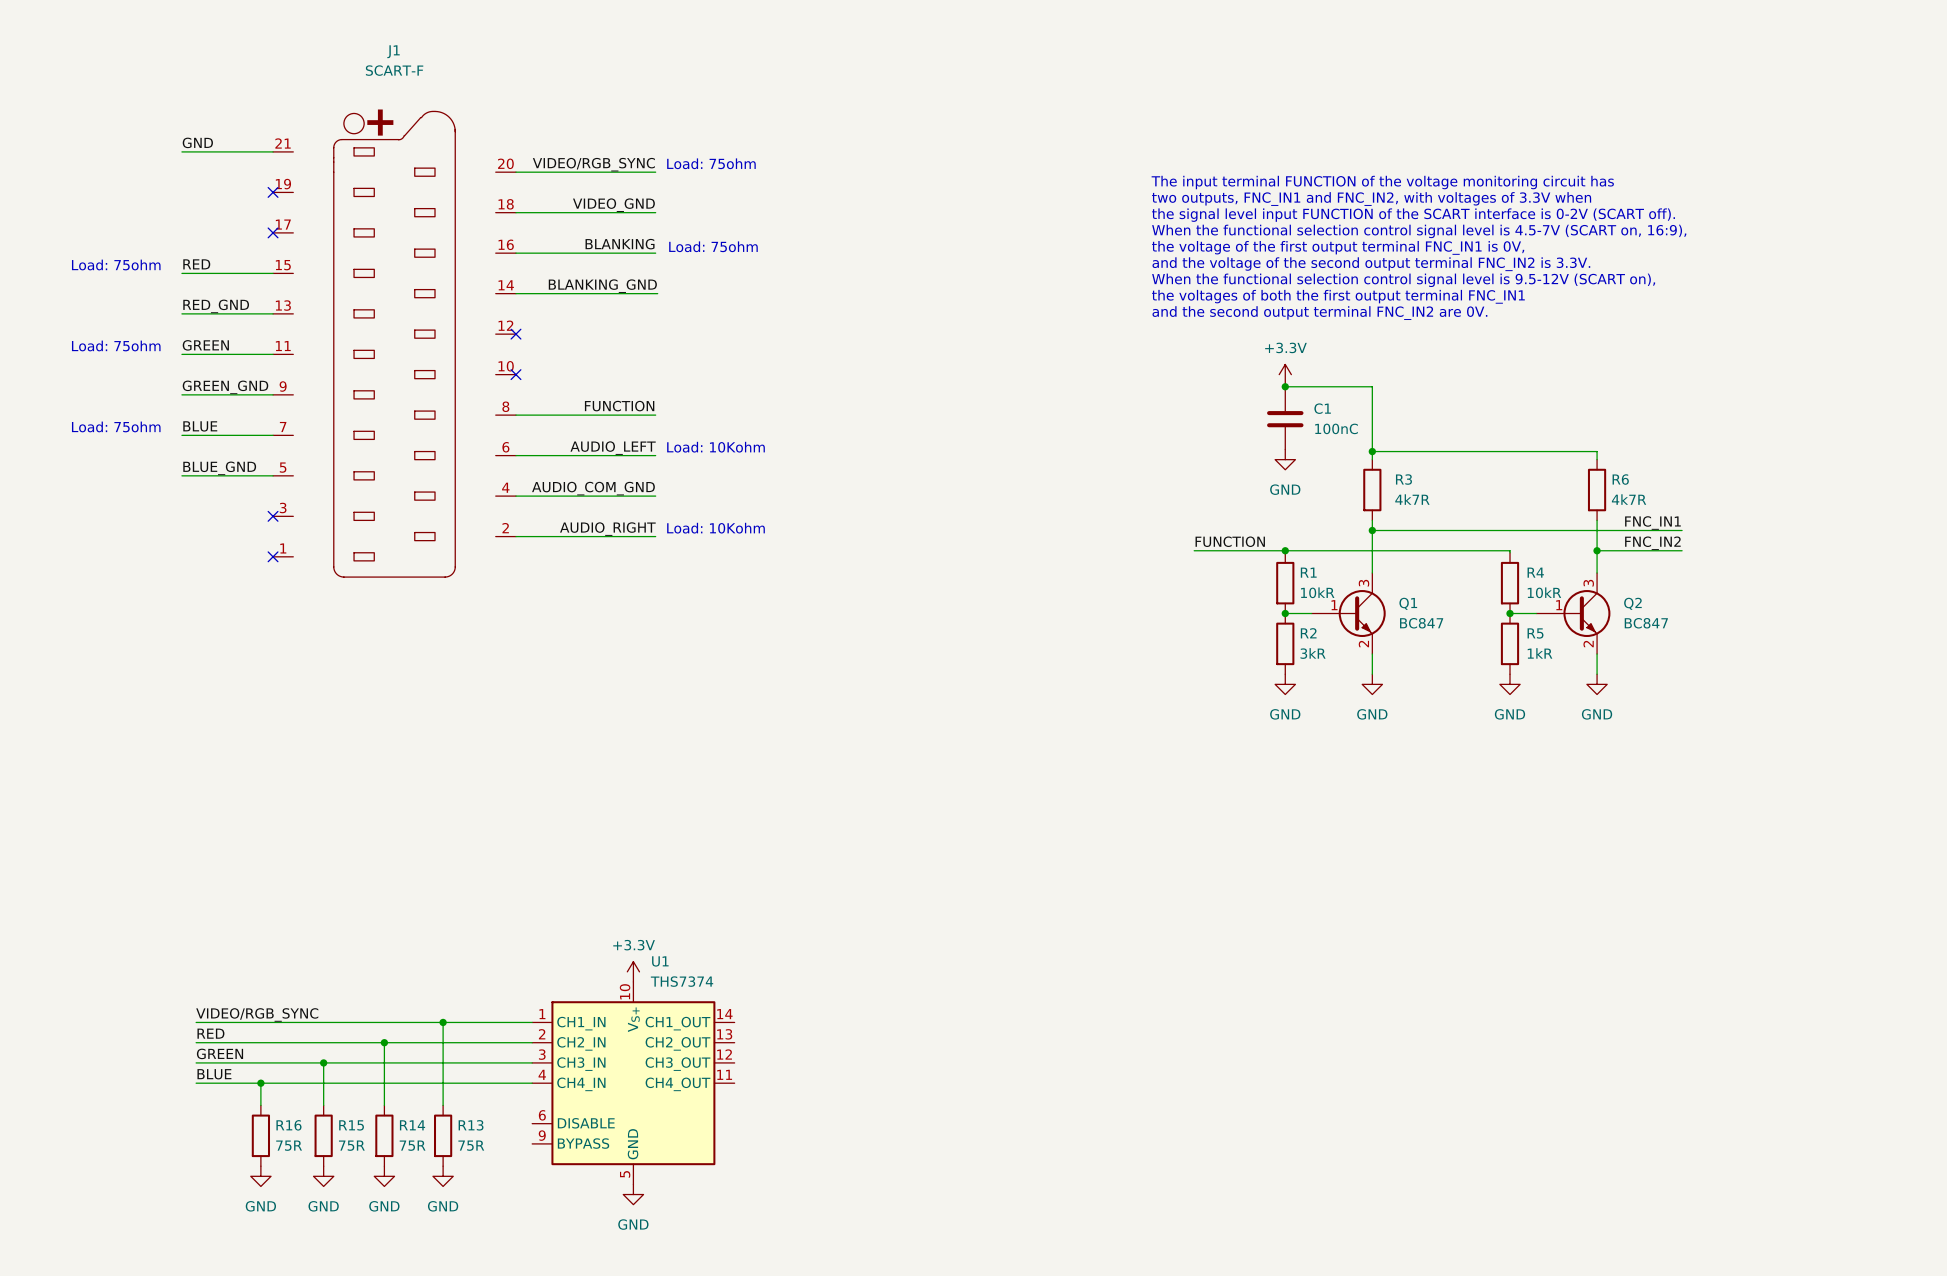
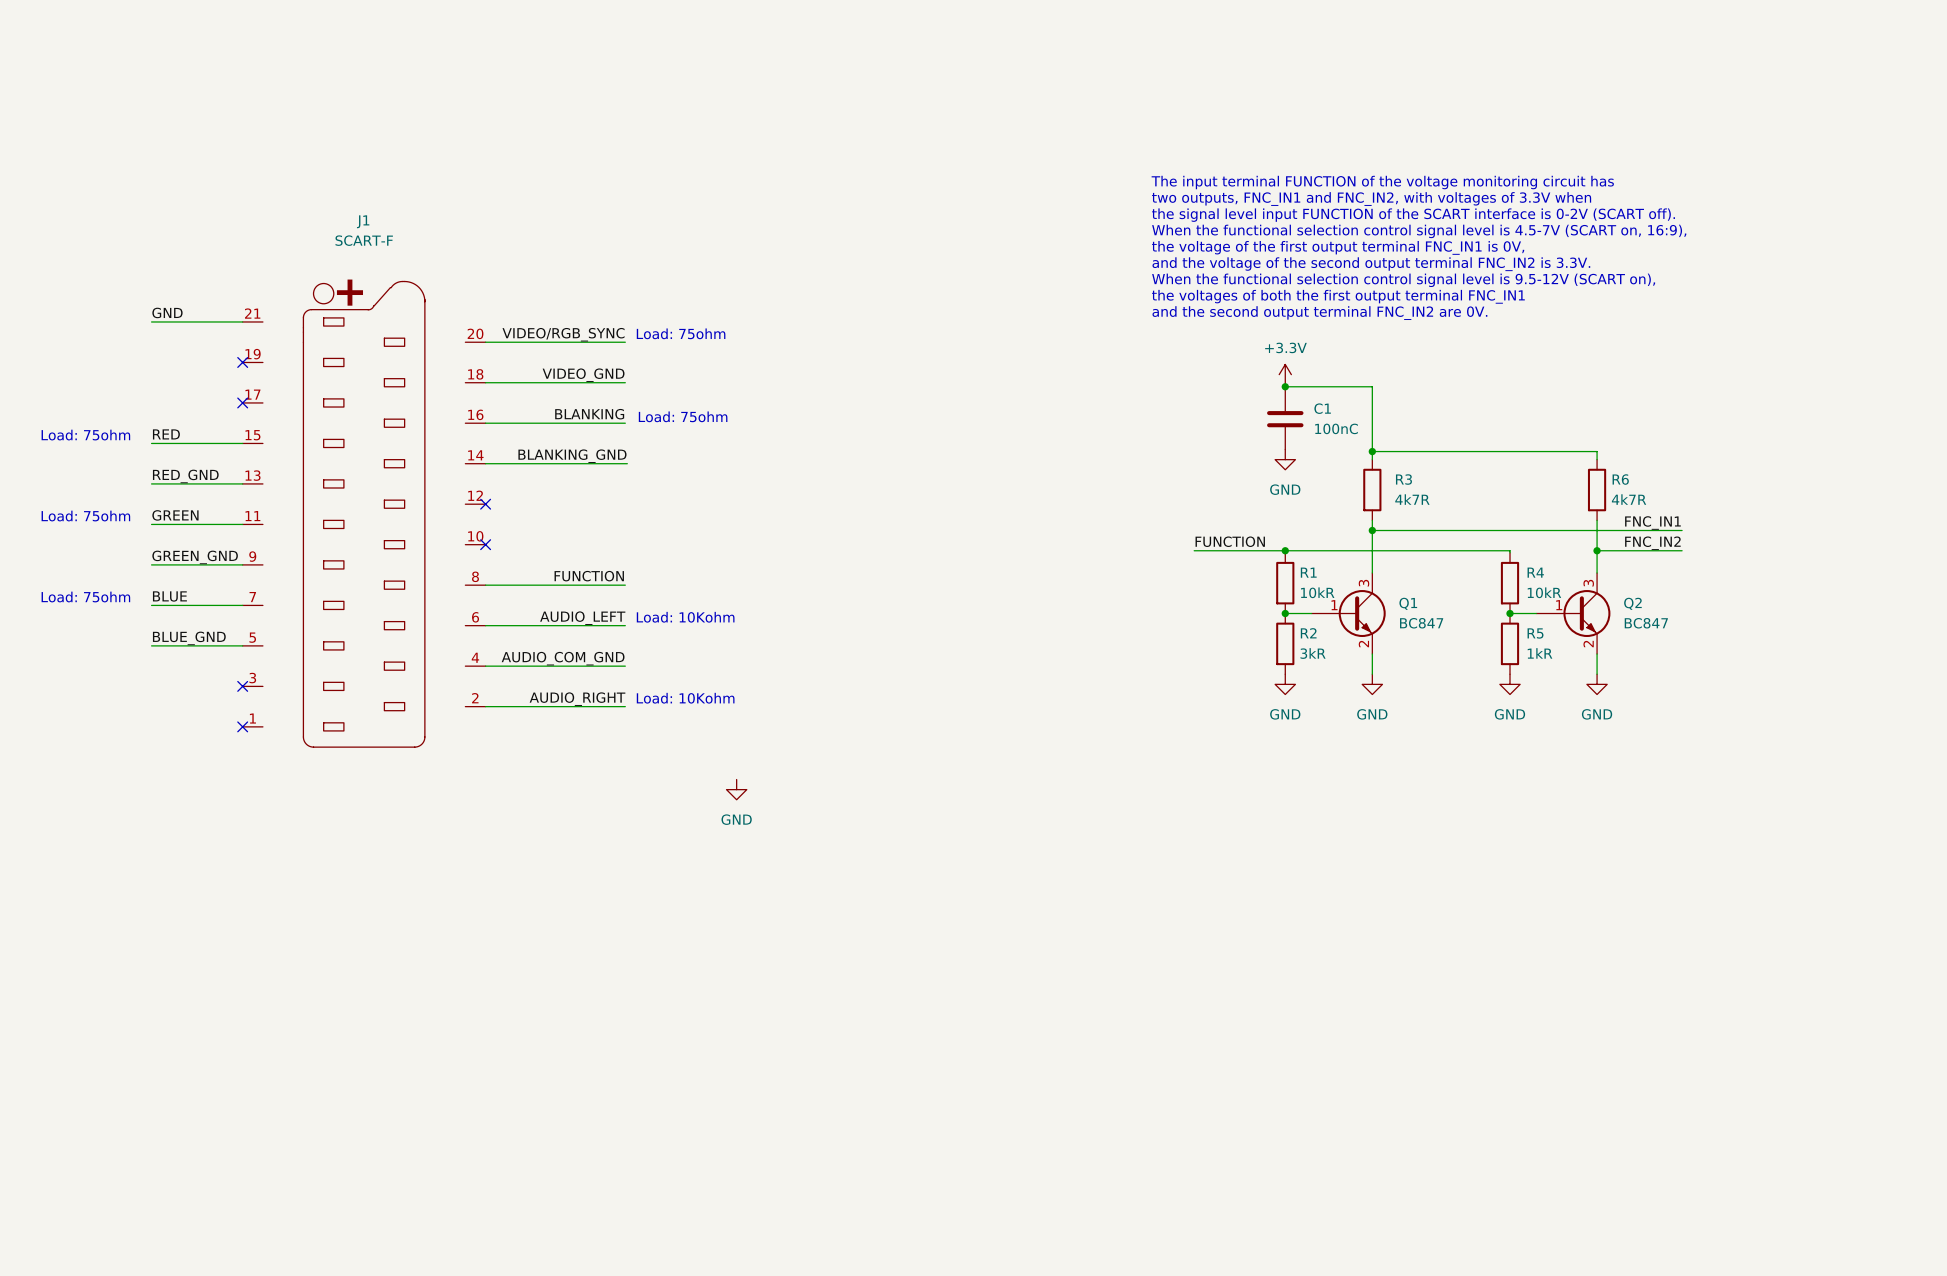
label position: GND (197, 142) -> GND (167, 312)
wire: (181, 151) (273, 151) -> (151, 321) (242, 321)
text: Load: 75ohm (711, 163) -> none
label position: VIDEO/RGB_SYNC (593, 164) -> VIDEO/RGB_SYNC (563, 334)
wire: (515, 172) (655, 172) -> (485, 342) (625, 342)
no-connect mark: (273, 192) -> none
label position: VIDEO_GND (613, 205) -> VIDEO_GND (583, 375)
wire: (515, 212) (655, 212) -> (485, 382) (625, 382)
no-connect mark: (273, 232) -> none
label position: BLANKING (620, 244) -> BLANKING (589, 414)
text: Load: 75ohm (713, 246) -> none
wire: (515, 253) (655, 253) -> (485, 423) (625, 423)
text: Load: 75ohm (116, 264) -> none
label position: RED (196, 264) -> RED (166, 434)
wire: (181, 273) (273, 273) -> (151, 443) (242, 443)
label position: BLANKING_GND (602, 286) -> BLANKING_GND (572, 456)
wire: (515, 293) (657, 293) -> (485, 463) (627, 463)
label position: RED_GND (216, 306) -> RED_GND (185, 476)
wire: (181, 313) (273, 313) -> (151, 483) (242, 483)
text: none -> Load: 75ohm (681, 333)
no-connect mark: (515, 334) -> none
J1 position: (394, 344) -> (364, 514)
text: Load: 75ohm (116, 345) -> none
label position: GREEN (205, 345) -> GREEN (175, 515)
wire: (181, 354) (273, 354) -> (151, 524) (242, 524)
no-connect mark: none -> (242, 362)
no-connect mark: (515, 374) -> none
label position: GREEN_GND (225, 387) -> GREEN_GND (195, 557)
wire: (181, 394) (273, 394) -> (151, 564) (242, 564)
no-connect mark: none -> (242, 402)
label position: FUNCTION (619, 406) -> FUNCTION (589, 576)
wire: (515, 415) (655, 415) -> (485, 585) (625, 585)
text: none -> Load: 75ohm (683, 416)
text position: Load: 75ohm (116, 426) -> Load: 75ohm (85, 435)
label position: BLUE (200, 426) -> BLUE (169, 596)
wire: (181, 435) (273, 435) -> (151, 605) (242, 605)
text: Load: 10Kohm (716, 447) -> none
label position: AUDIO_LEFT (613, 448) -> AUDIO_LEFT (582, 618)
wire: (515, 455) (655, 455) -> (485, 625) (625, 625)
label position: BLUE_GND (219, 468) -> BLUE_GND (189, 638)
wire: (181, 475) (273, 475) -> (151, 645) (242, 645)
label position: AUDIO_COM_GND (593, 488) -> AUDIO_COM_GND (563, 658)
wire: (515, 496) (655, 496) -> (485, 666) (625, 666)
no-connect mark: none -> (485, 504)
text: none -> Load: 75ohm (85, 516)
no-connect mark: (273, 516) -> none
text: Load: 10Kohm (716, 528) -> none
label position: AUDIO_RIGHT (607, 529) -> AUDIO_RIGHT (577, 699)
wire: (515, 536) (655, 536) -> (485, 706) (625, 706)
no-connect mark: none -> (485, 544)
no-connect mark: (273, 556) -> none
text: none -> Load: 75ohm (85, 597)
text: none -> Load: 10Kohm (685, 617)
no-connect mark: none -> (242, 686)
text: none -> Load: 10Kohm (685, 698)
no-connect mark: none -> (242, 726)
power symbol: none -> GND (736, 789)
power symbol: +3.3V (633, 971) -> none
label: VIDEO/RGB_SYNC (257, 1014) -> none
wire: (196, 1022) (532, 1022) -> none
wire: (443, 1022) (443, 1105) -> none
junction: (443, 1022) -> none
label: RED (210, 1033) -> none
wire: (196, 1042) (532, 1042) -> none
wire: (384, 1042) (384, 1105) -> none
junction: (384, 1042) -> none
label: GREEN (219, 1053) -> none
wire: (196, 1062) (532, 1062) -> none
wire: (323, 1062) (323, 1105) -> none
junction: (323, 1062) -> none
label: BLUE (214, 1074) -> none
wire: (196, 1083) (532, 1083) -> none
wire: (260, 1083) (260, 1105) -> none
junction: (260, 1083) -> none
U1: THS7374 (633, 1083) -> none
R16: 75R (260, 1135) -> none
R15: 75R (323, 1135) -> none
R14: 75R (384, 1135) -> none
R13: 75R (443, 1135) -> none
power symbol: GND (260, 1176) -> none
power symbol: GND (323, 1176) -> none
power symbol: GND (384, 1176) -> none
power symbol: GND (443, 1176) -> none
power symbol: GND (633, 1194) -> none

